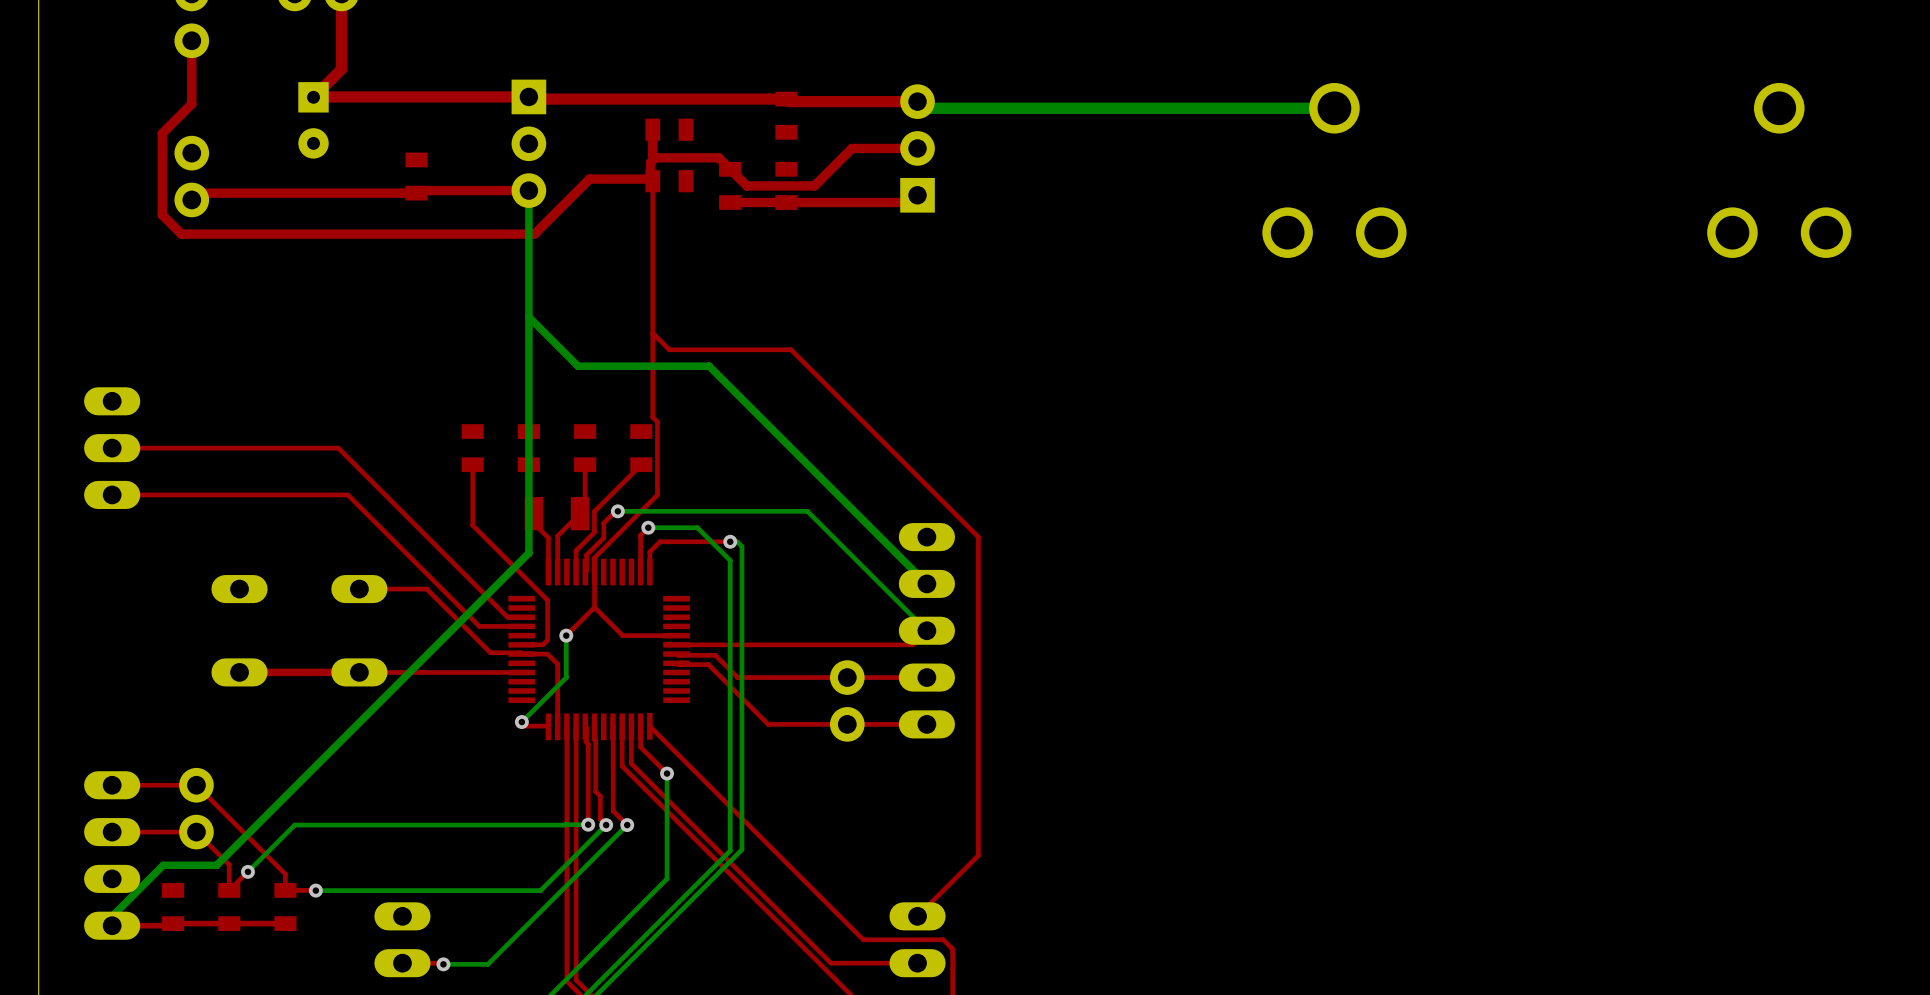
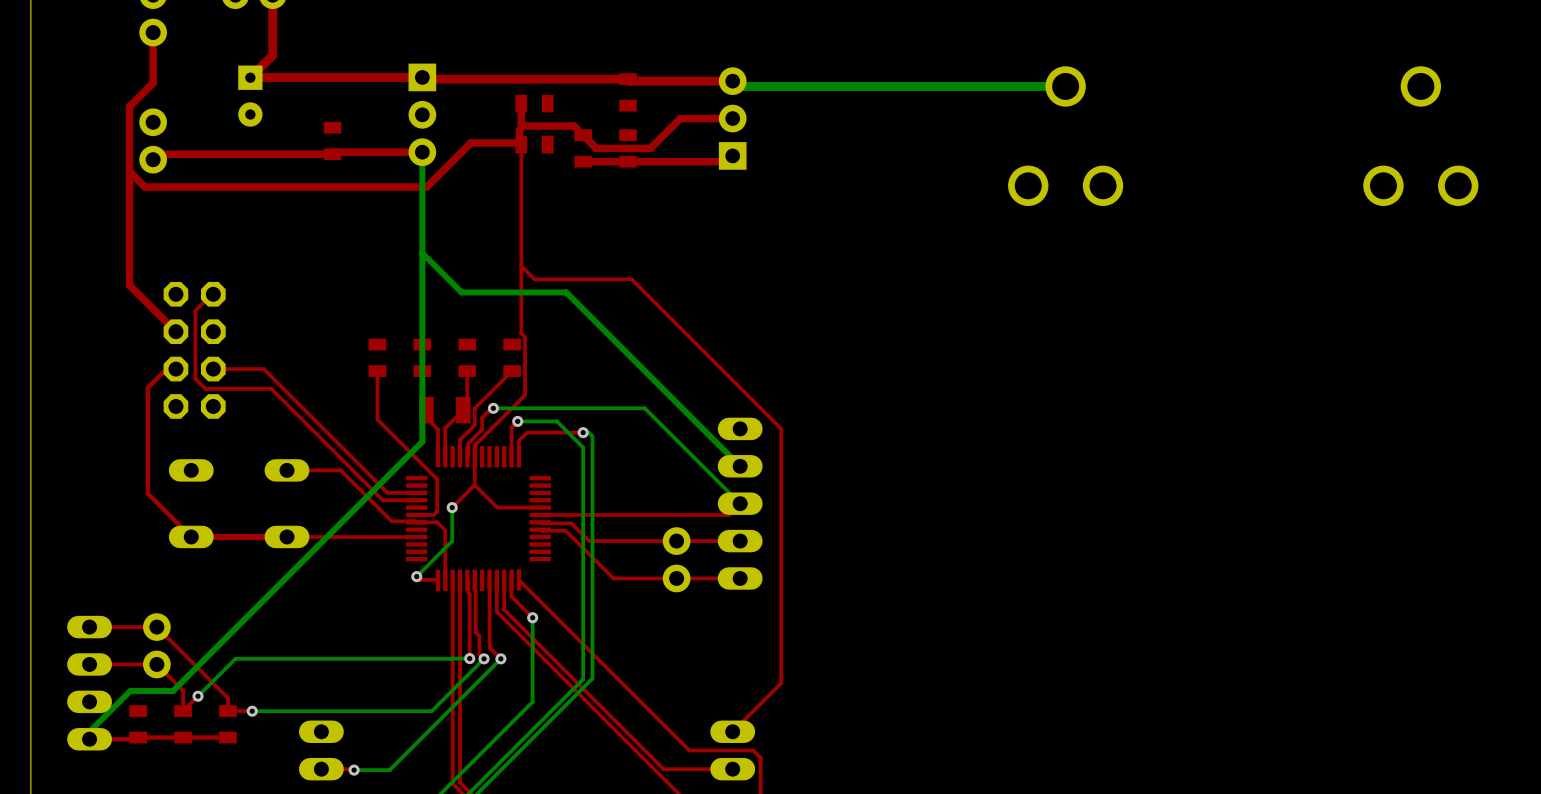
top track: none -> (129, 171) (129, 285) (175, 331)
part: none -> (194, 350)
top track: (112, 448) (338, 448) (507, 617) -> (213, 369) (263, 369) (387, 492) (405, 492)
part: (112, 448) -> none
top track: none -> (175, 369) (166, 369) (147, 387) (147, 493) (191, 536)
top track: (347, 494) (112, 494) -> (277, 395) (271, 388) (205, 388) (195, 378) (195, 310) (213, 294)

